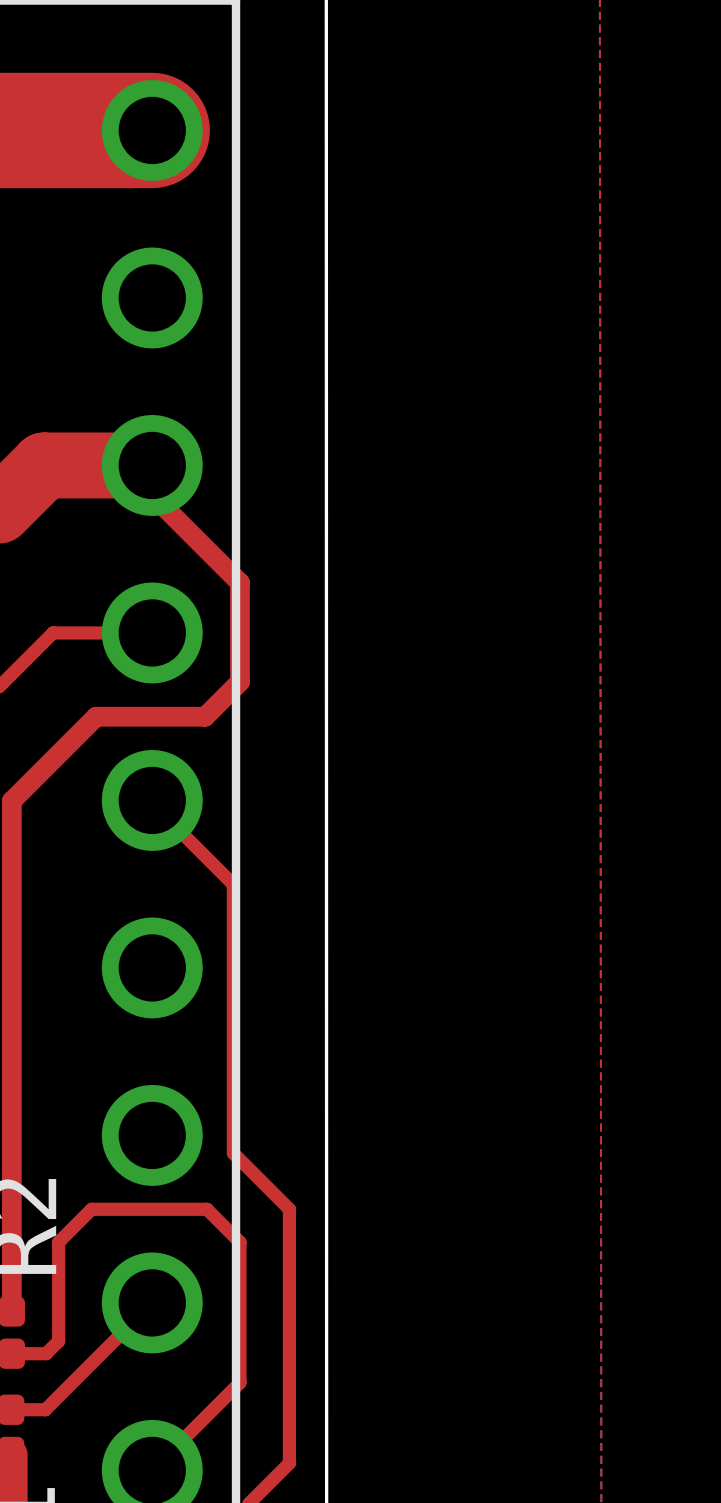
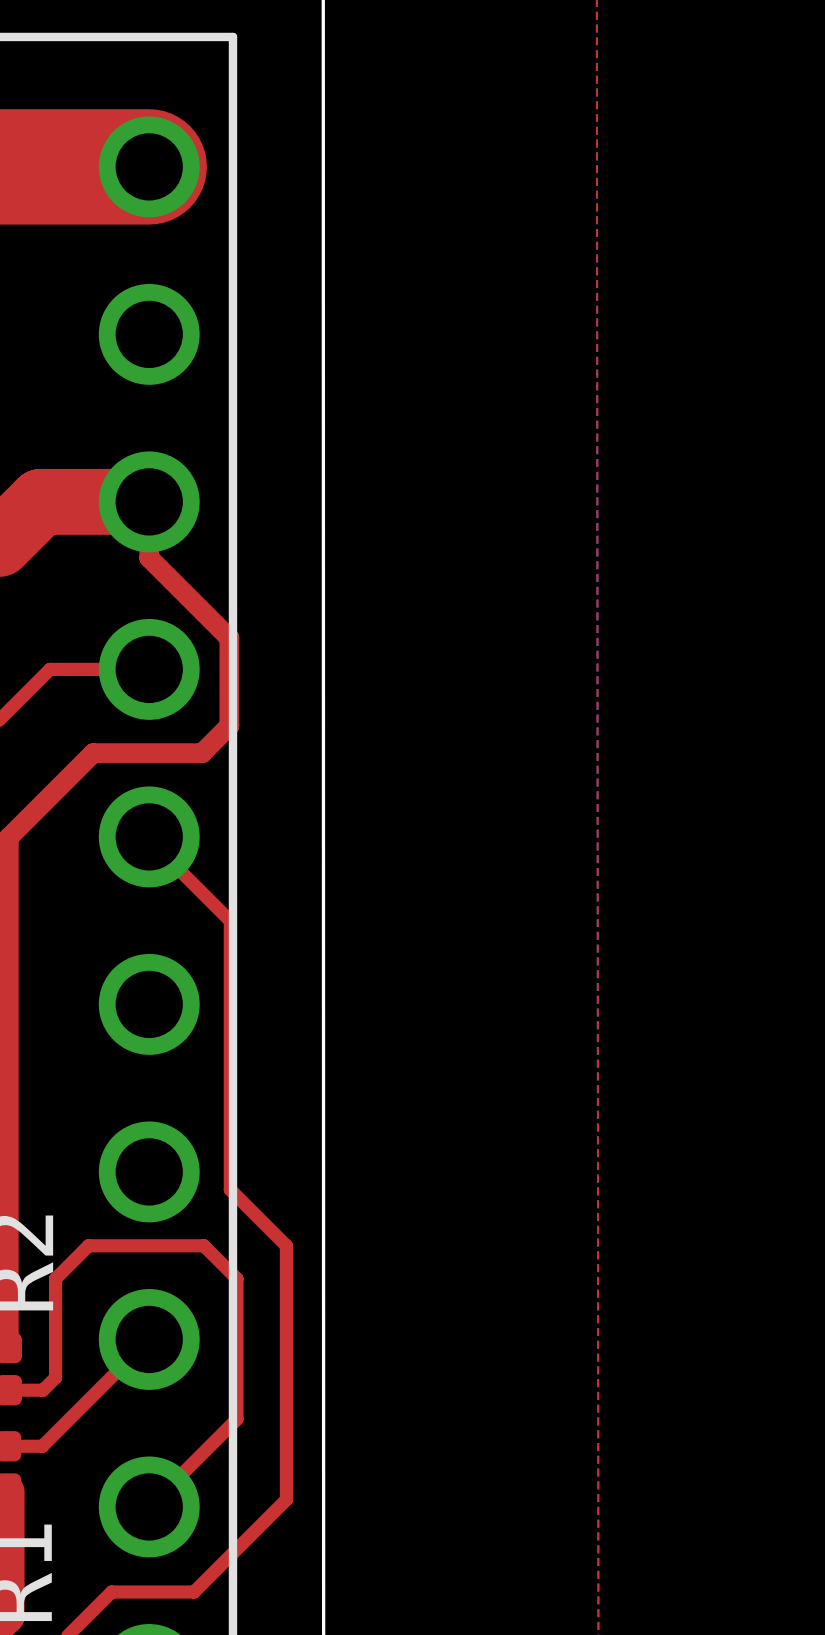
top track: (152, 495) (239, 582) (239, 681) (232, 689) -> (149, 531) (149, 557) (229, 638) (229, 725)

